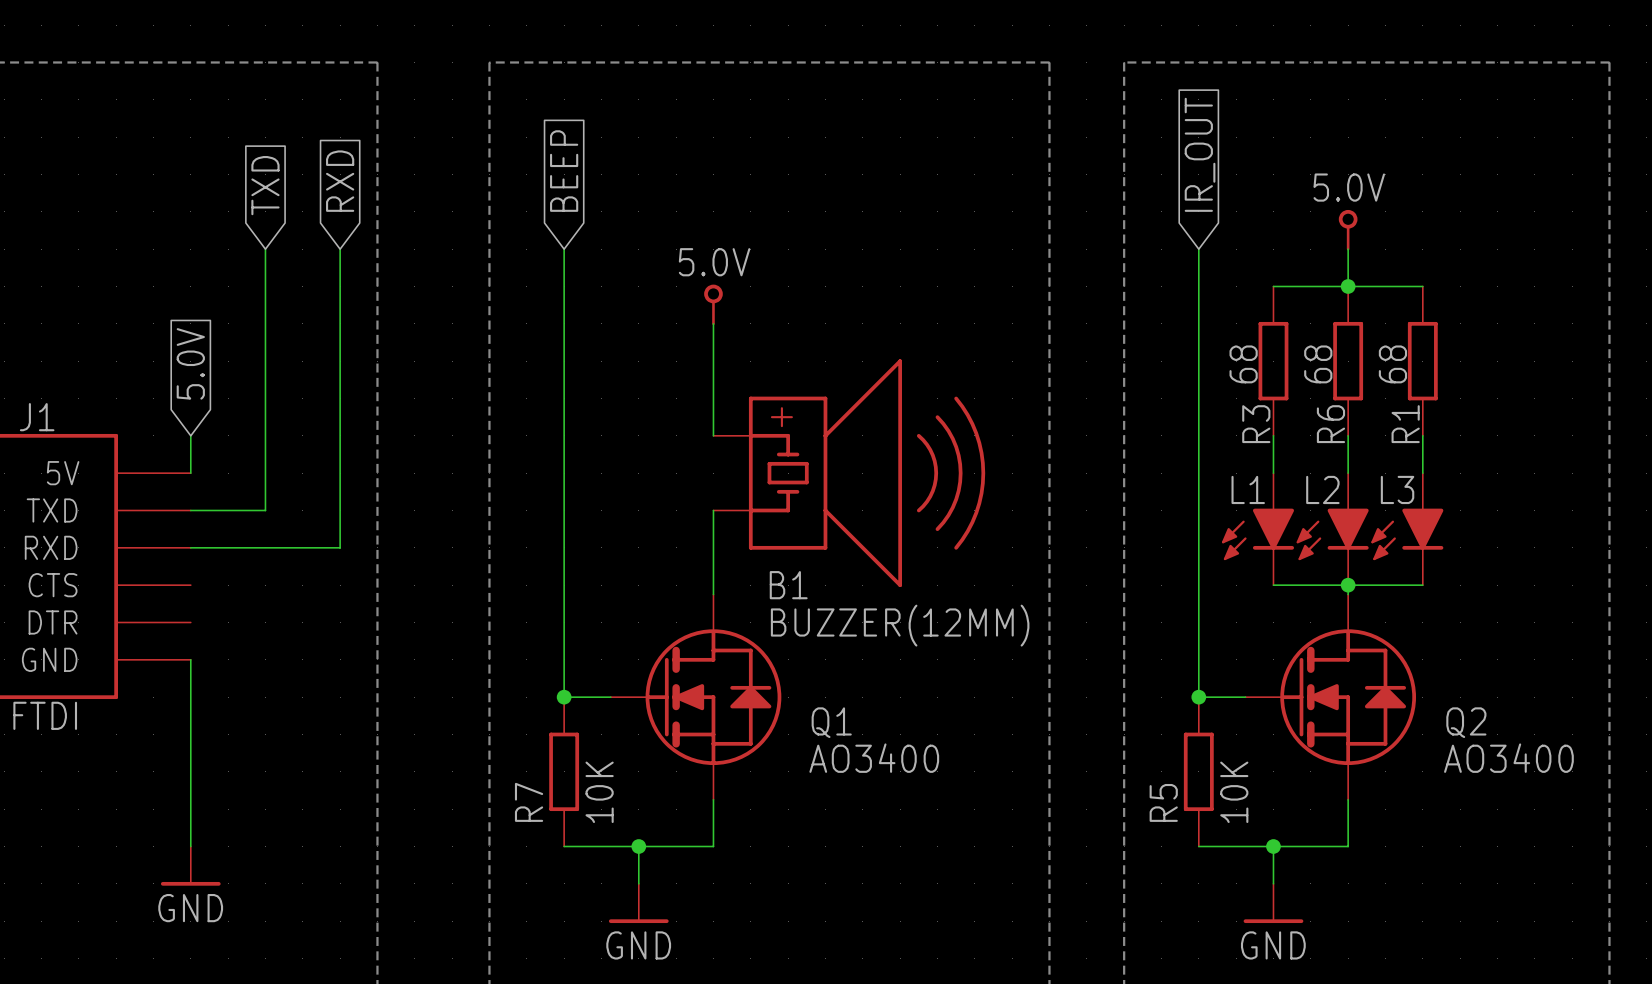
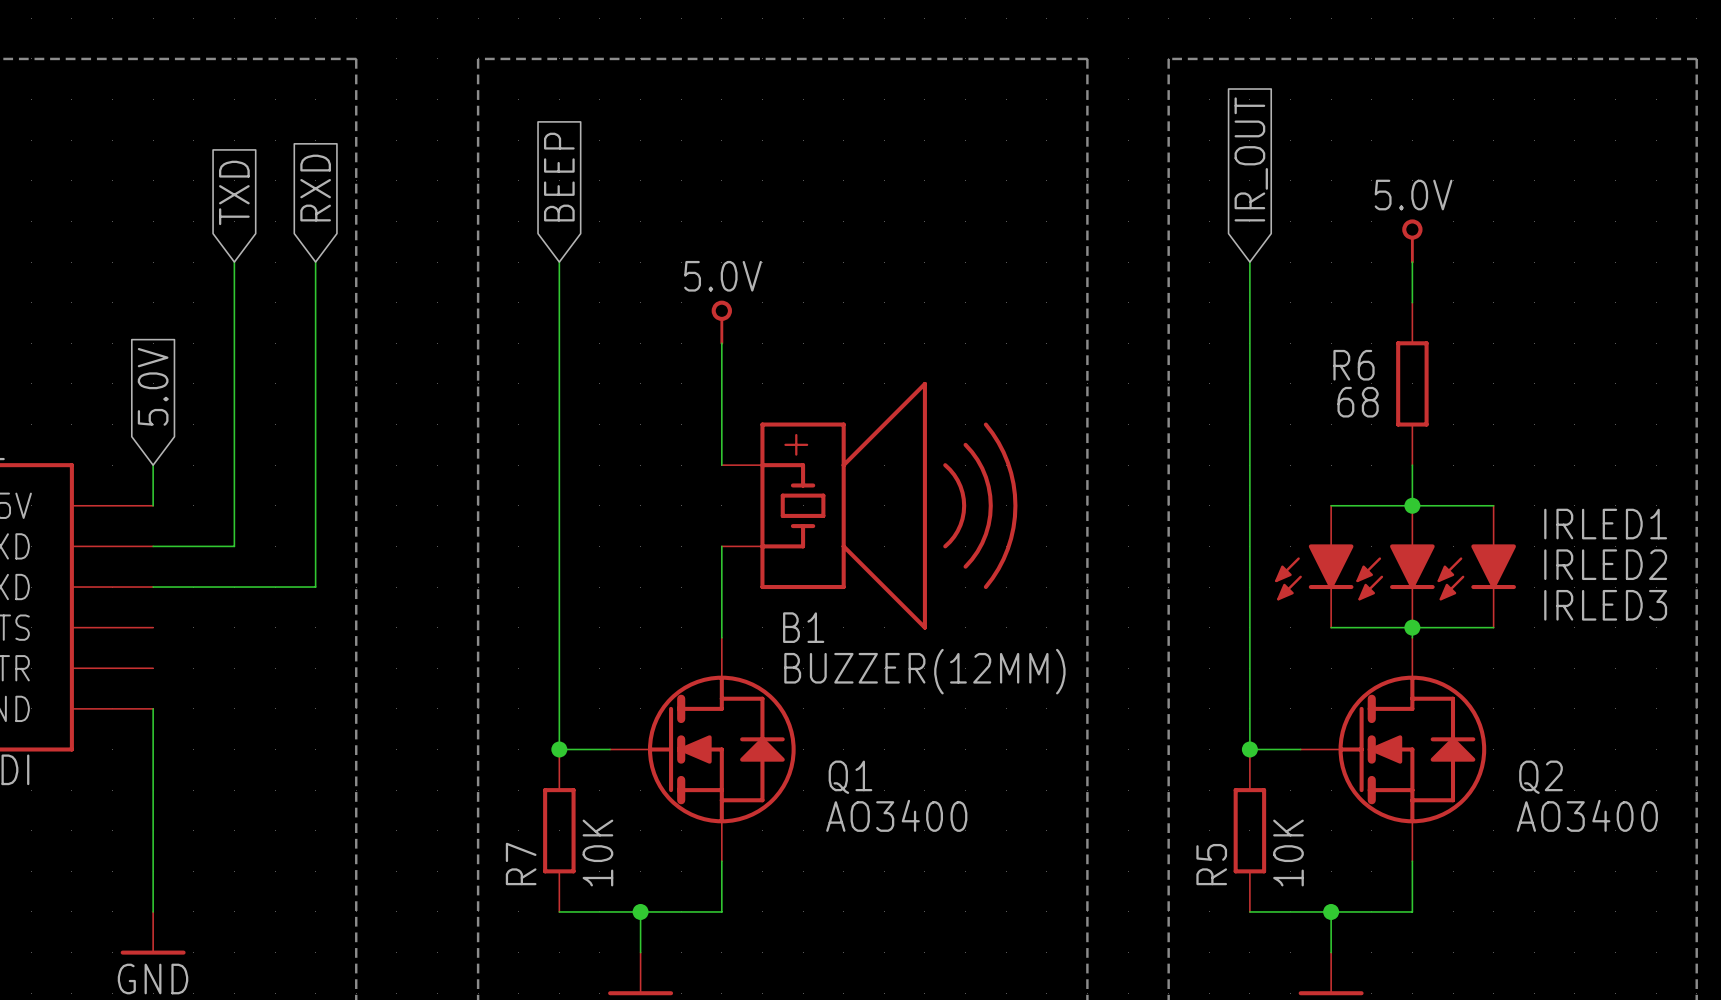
wire: (1273, 286) (1422, 286) -> none
junction: (1348, 286) -> none
R3: 68 (1273, 361) -> none
R1: 68 (1422, 361) -> none
R6 value rotation: 0° (1318, 364) -> 90° clockwise (1358, 402)
R6 name rotation: 0° (1330, 424) -> 90° clockwise (1354, 365)
R6 name position: R6 (1330, 424) -> R6 (1354, 365)
wire: (1273, 435) (1273, 473) -> (1493, 505) (1331, 505)
wire: (1422, 435) (1422, 473) -> none
junction: none -> (1412, 505)
L1 name: L1 (1248, 489) -> IRLED1 (1605, 524)
L2 name: L2 (1322, 489) -> IRLED2 (1605, 564)
L3 name: L3 (1397, 489) -> IRLED3 (1605, 605)

